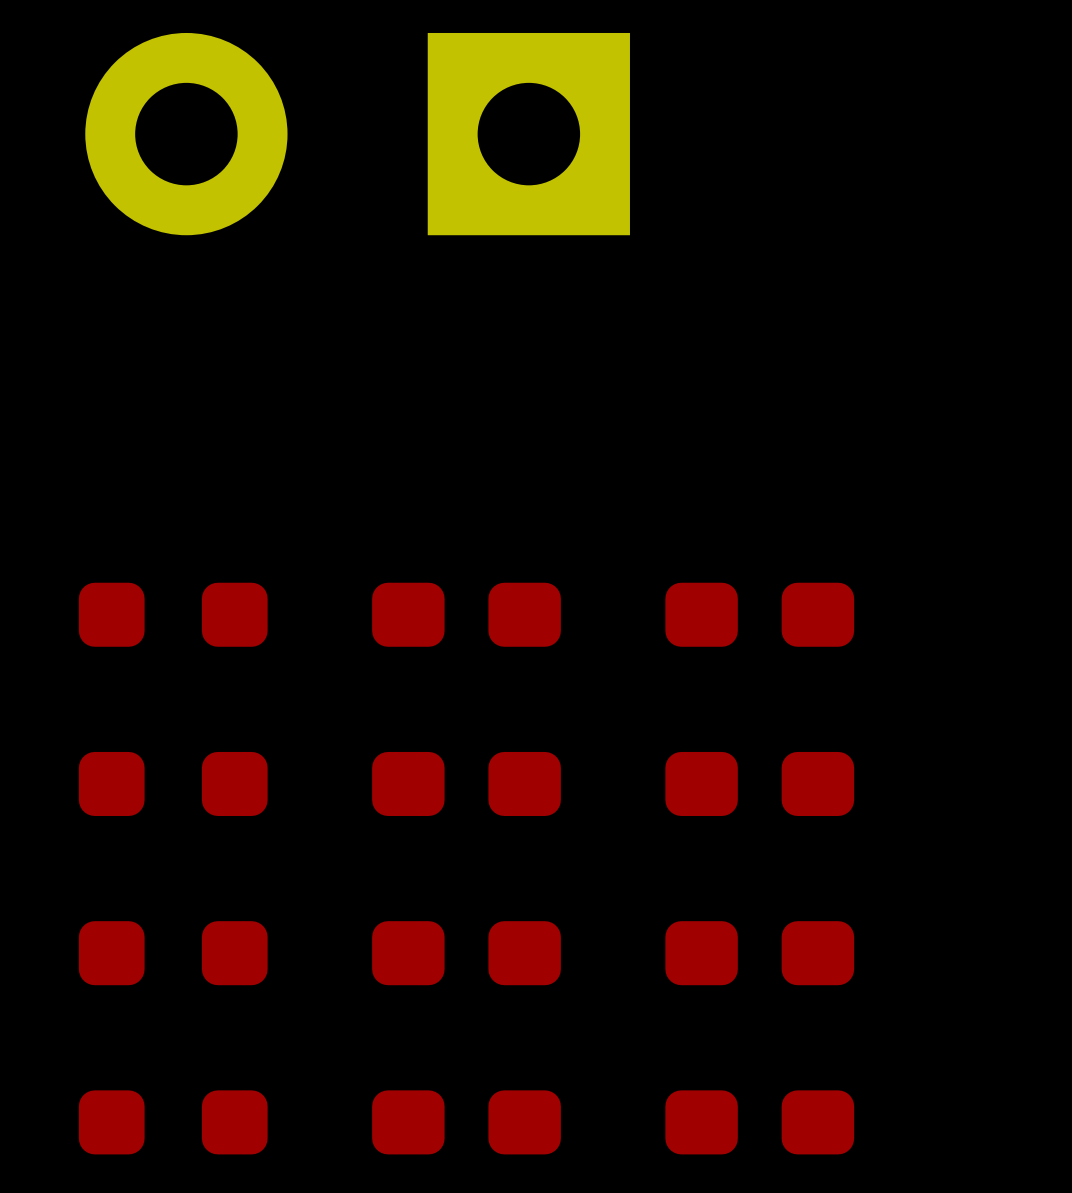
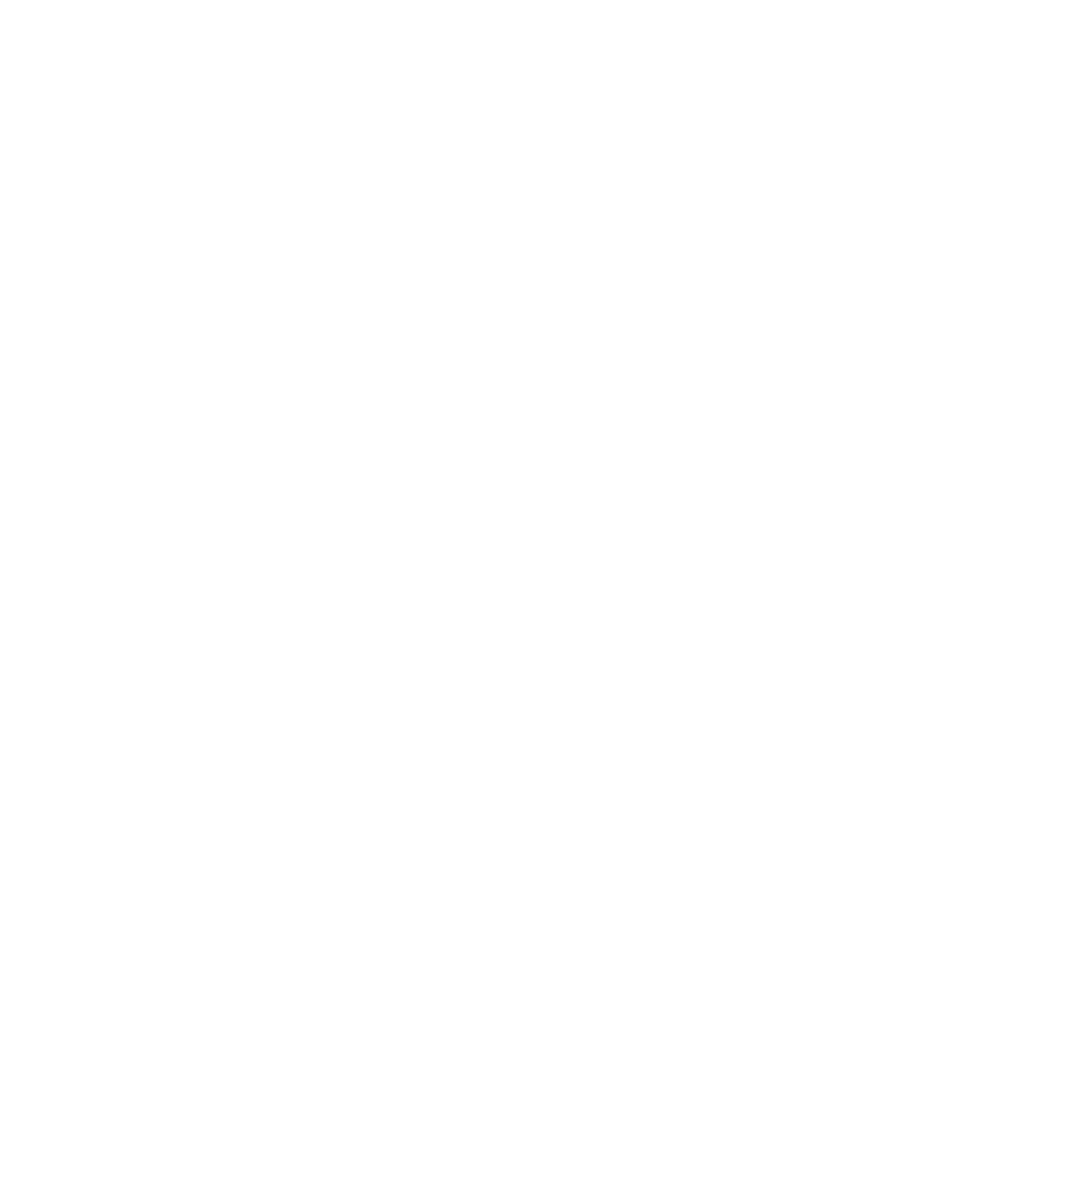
part: (357, 134) -> none
part: (173, 614) -> none
part: (466, 614) -> none
part: (759, 614) -> none
part: (173, 783) -> none
part: (466, 783) -> none
part: (759, 783) -> none
part: (173, 953) -> none
part: (466, 953) -> none
part: (759, 953) -> none
part: (173, 1122) -> none
part: (466, 1122) -> none
part: (759, 1122) -> none

